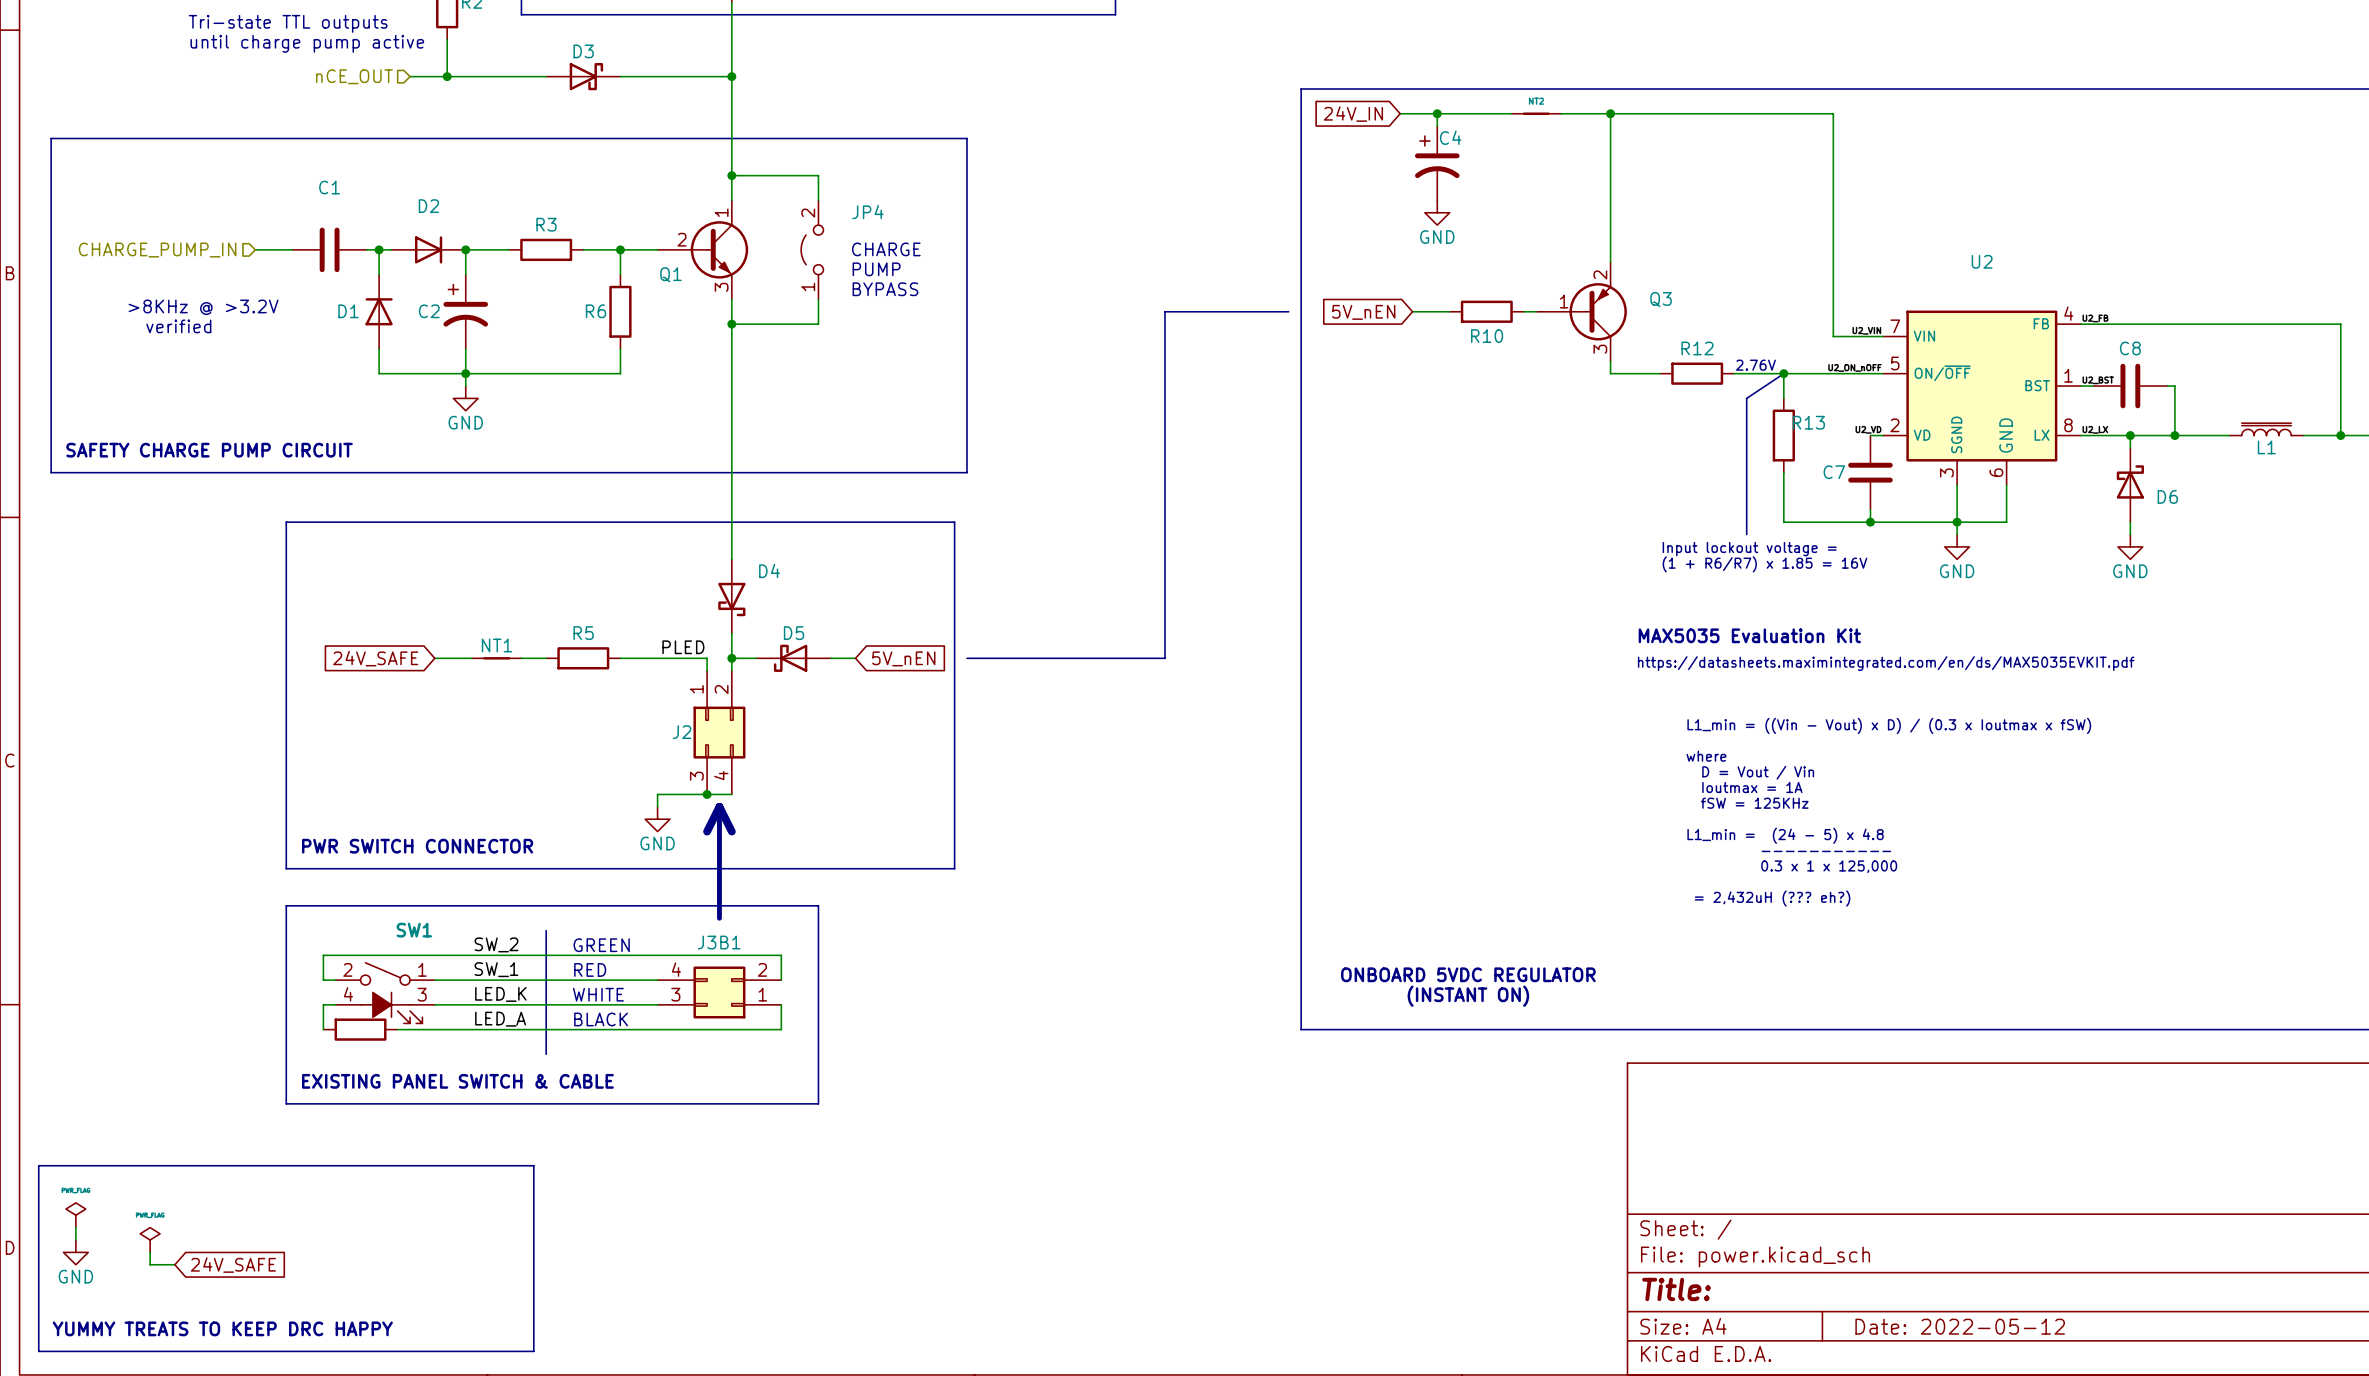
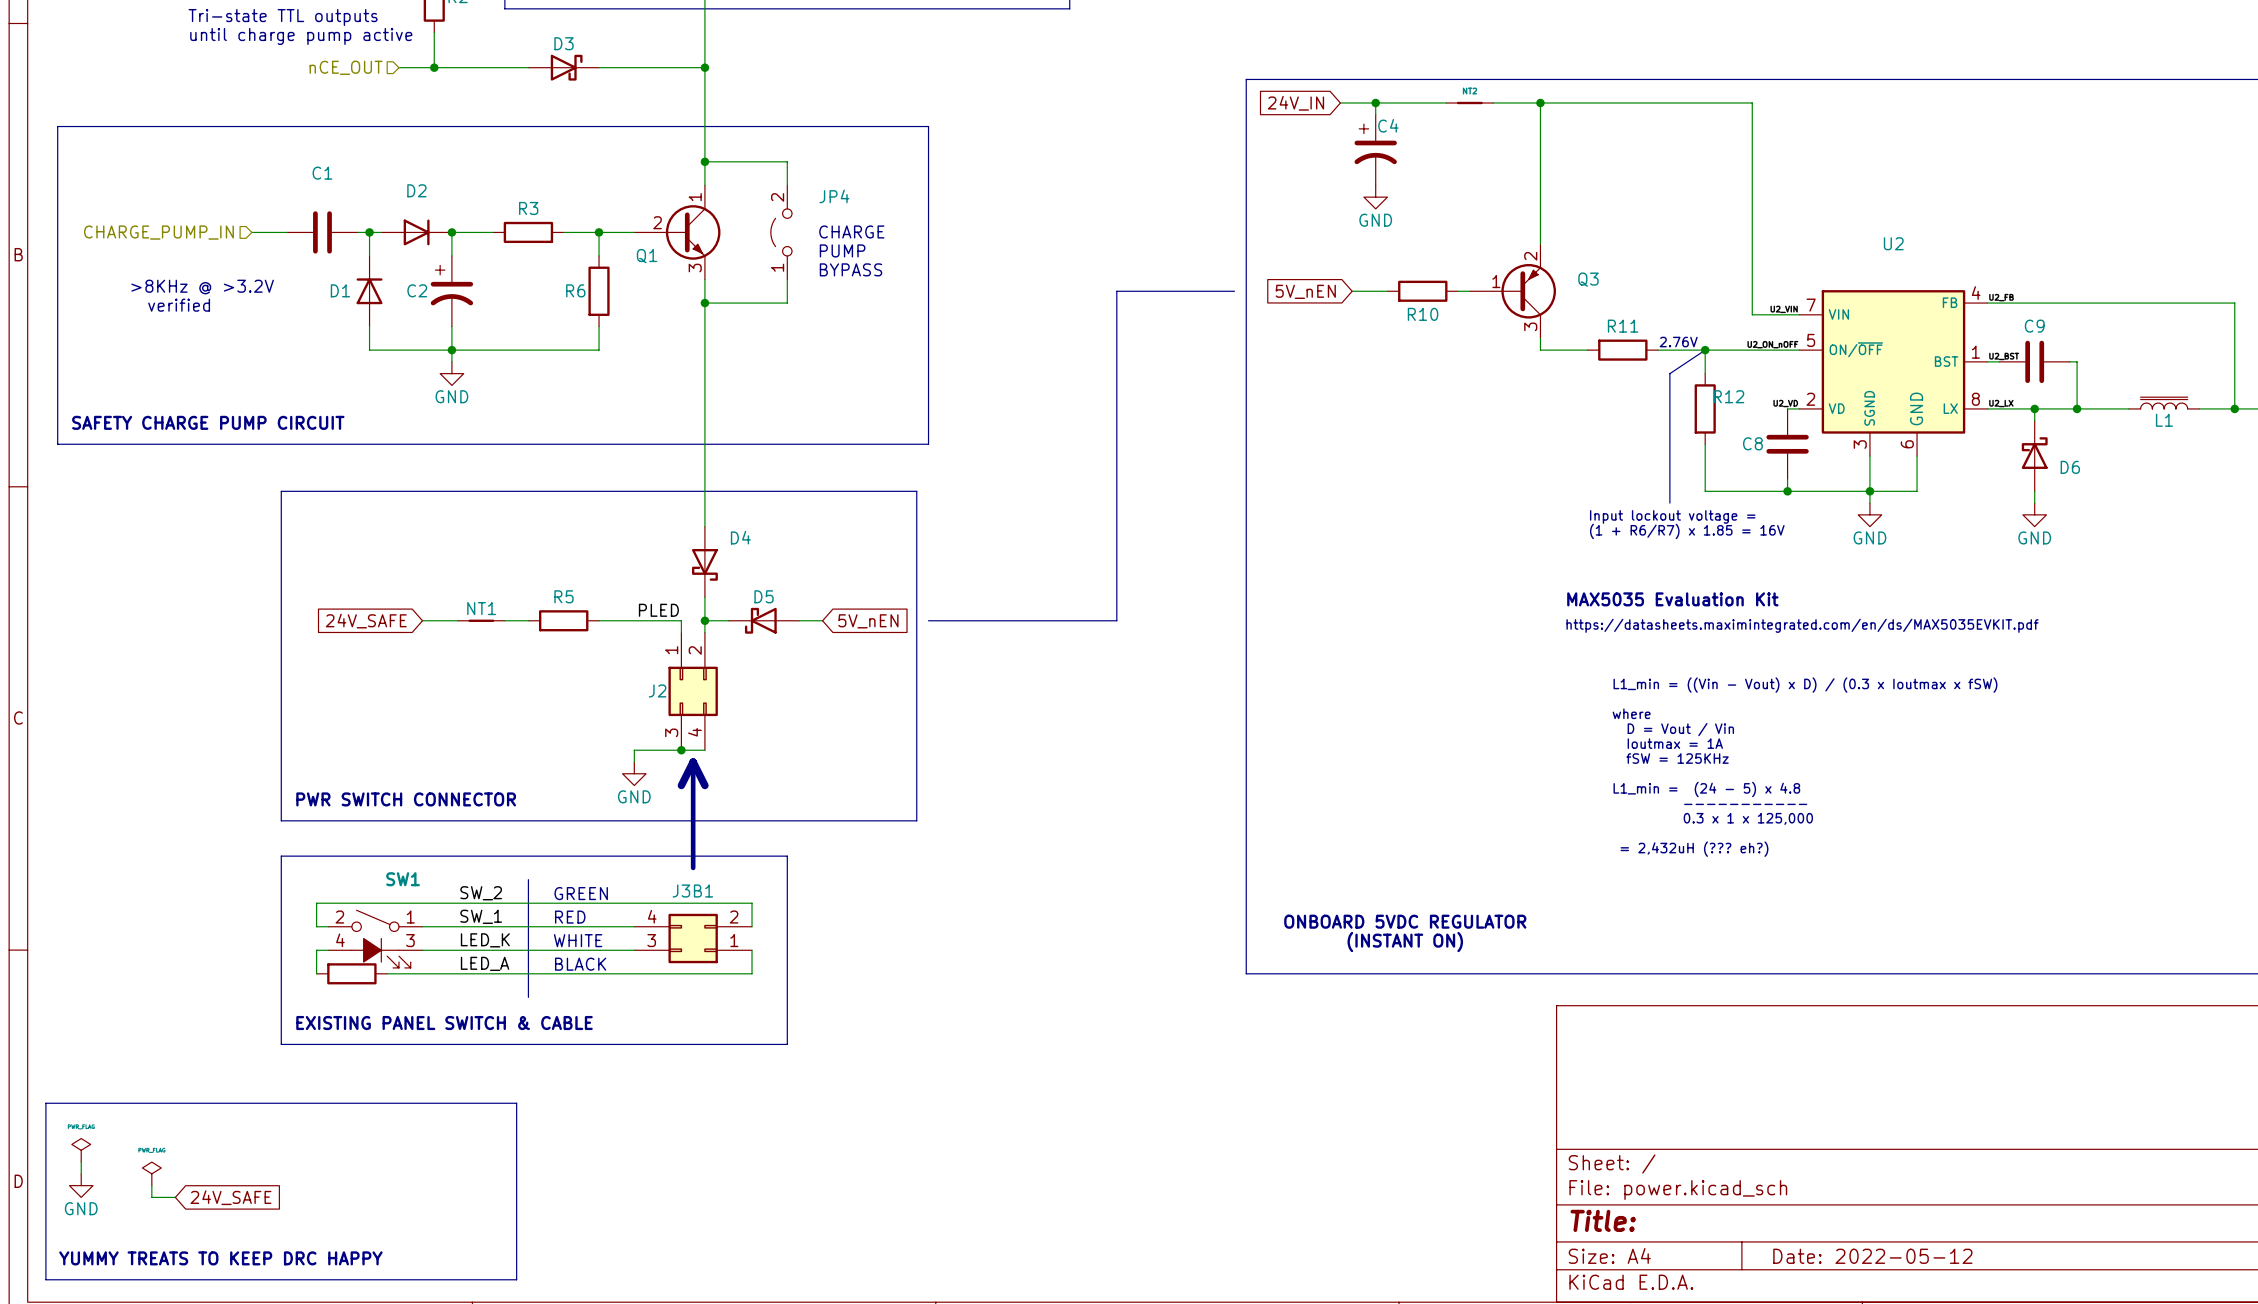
R12 name: R12 (1697, 348) -> R11 (1623, 326)
C8 name: C8 (2130, 348) -> C9 (2034, 326)
R13 name: R13 (1808, 422) -> R12 (1729, 396)
C7 name: C7 (1834, 472) -> C8 (1752, 443)

